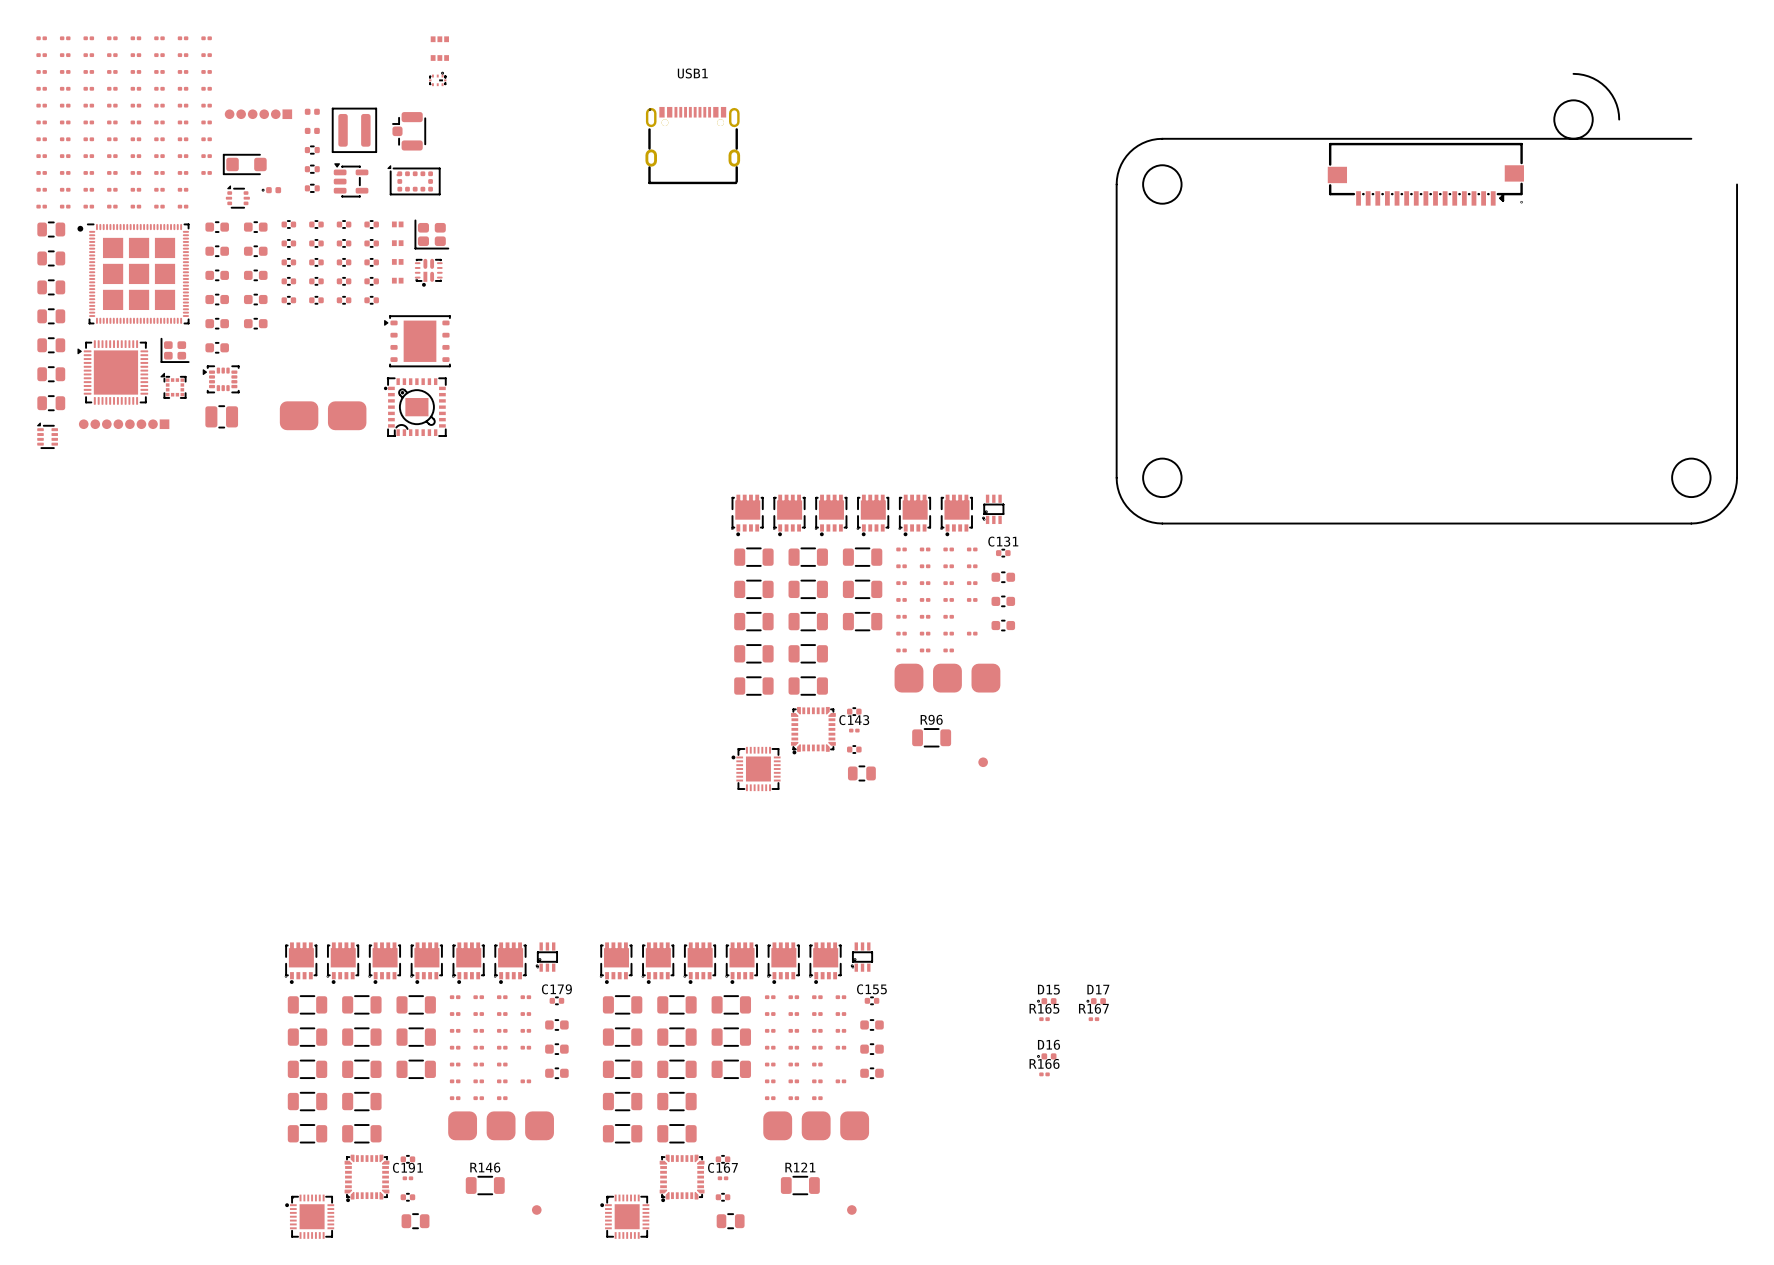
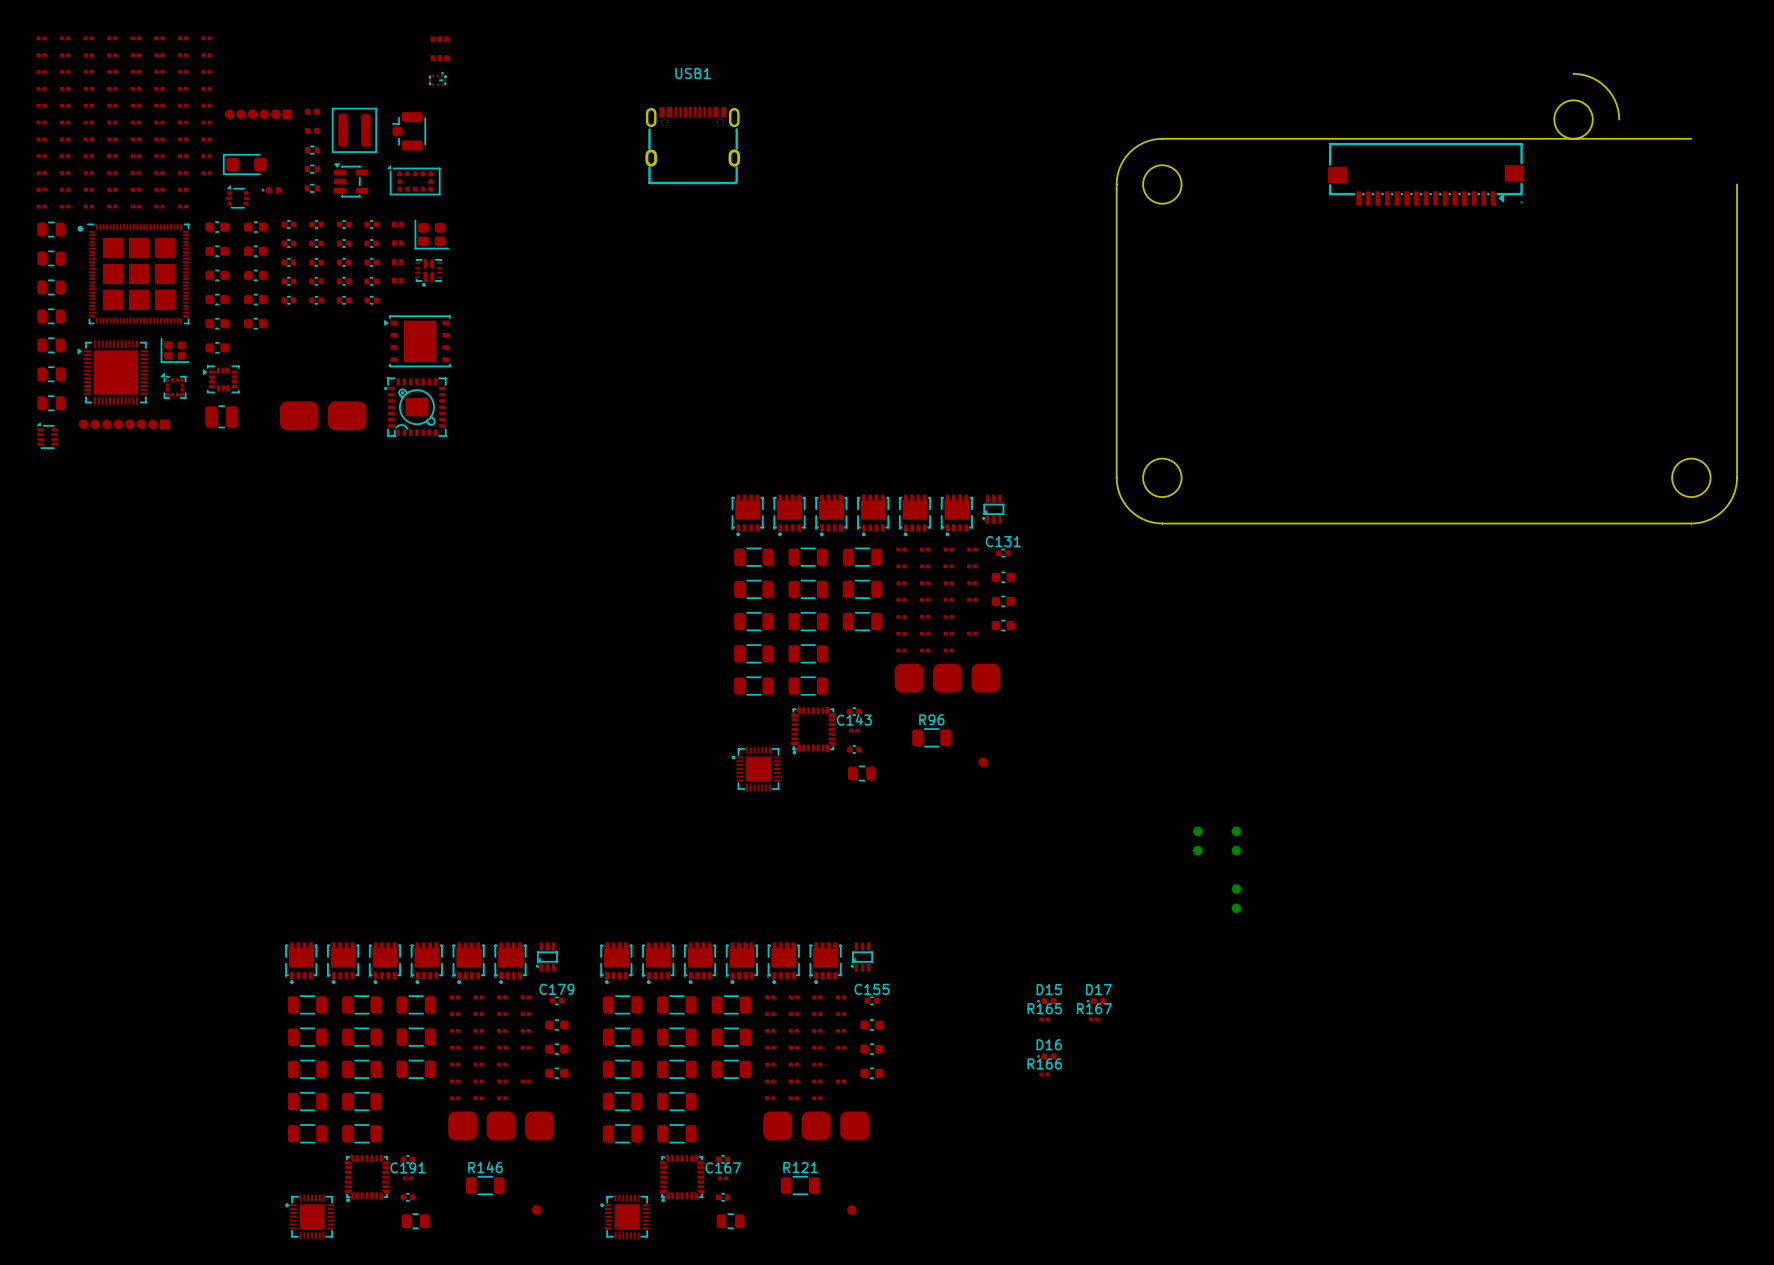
part: none -> (1197, 831)
part: none -> (1236, 831)
part: none -> (1197, 850)
part: none -> (1236, 850)
part: none -> (1236, 889)
part: none -> (1236, 908)

